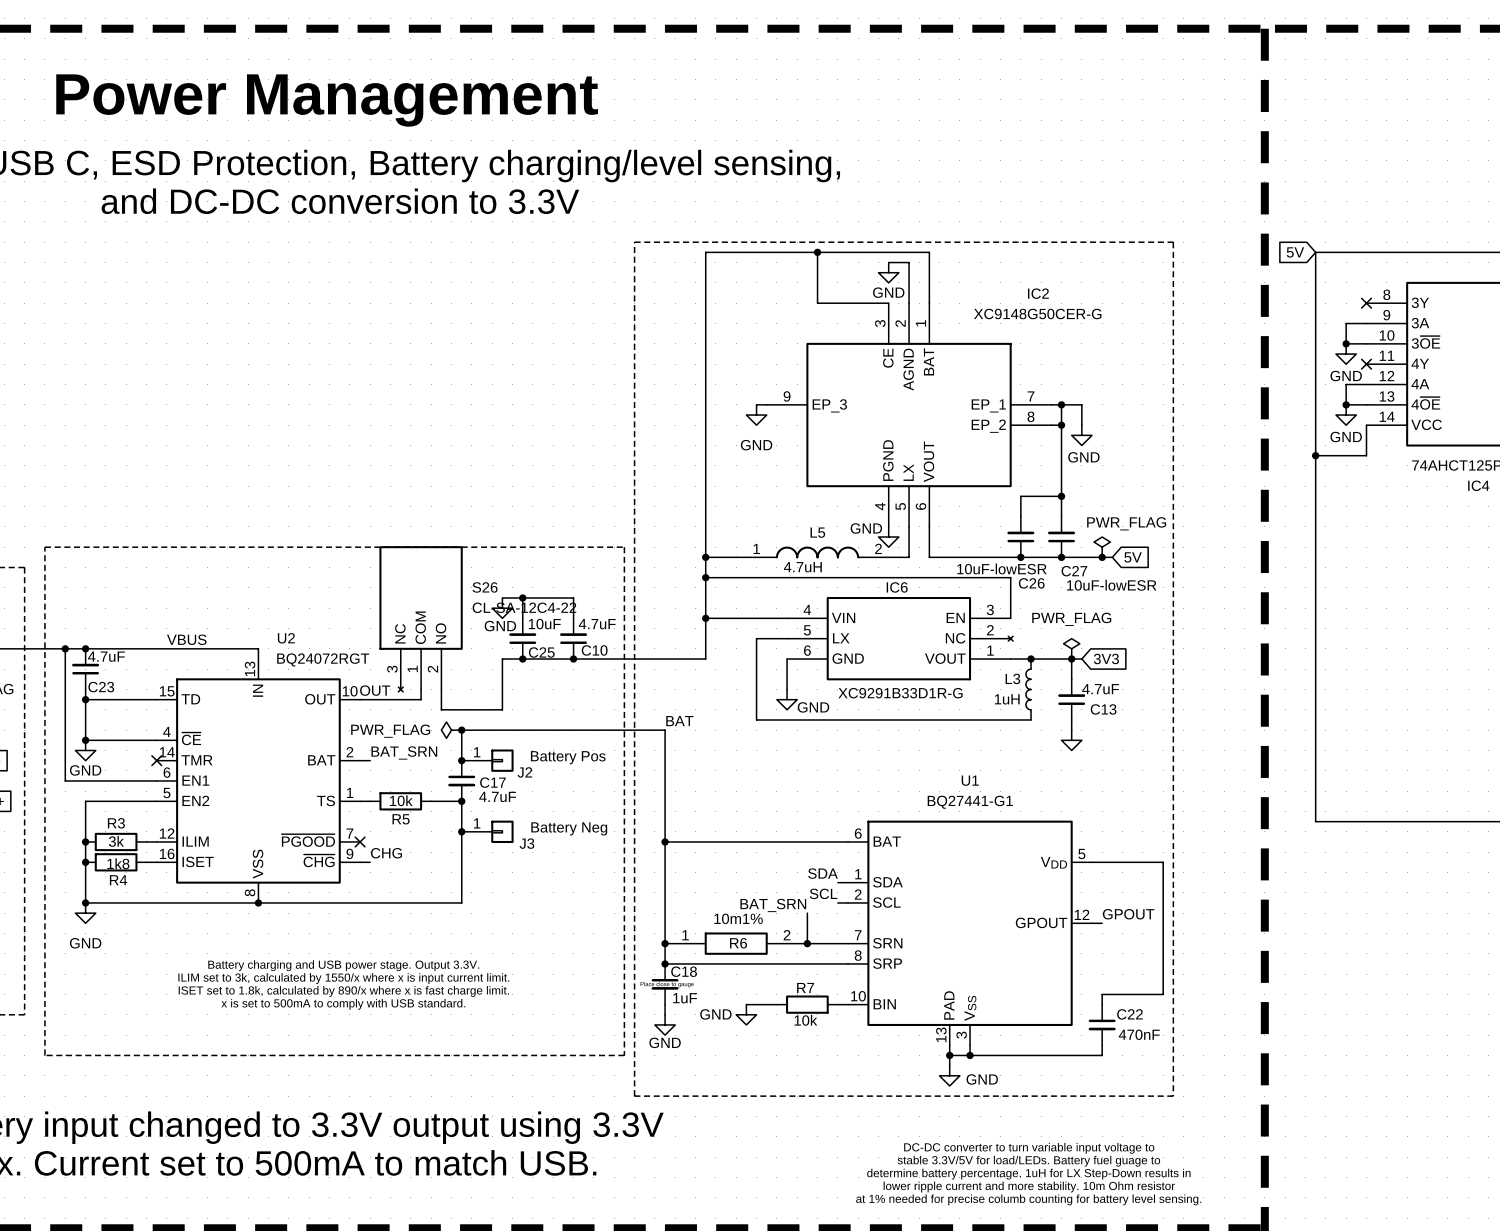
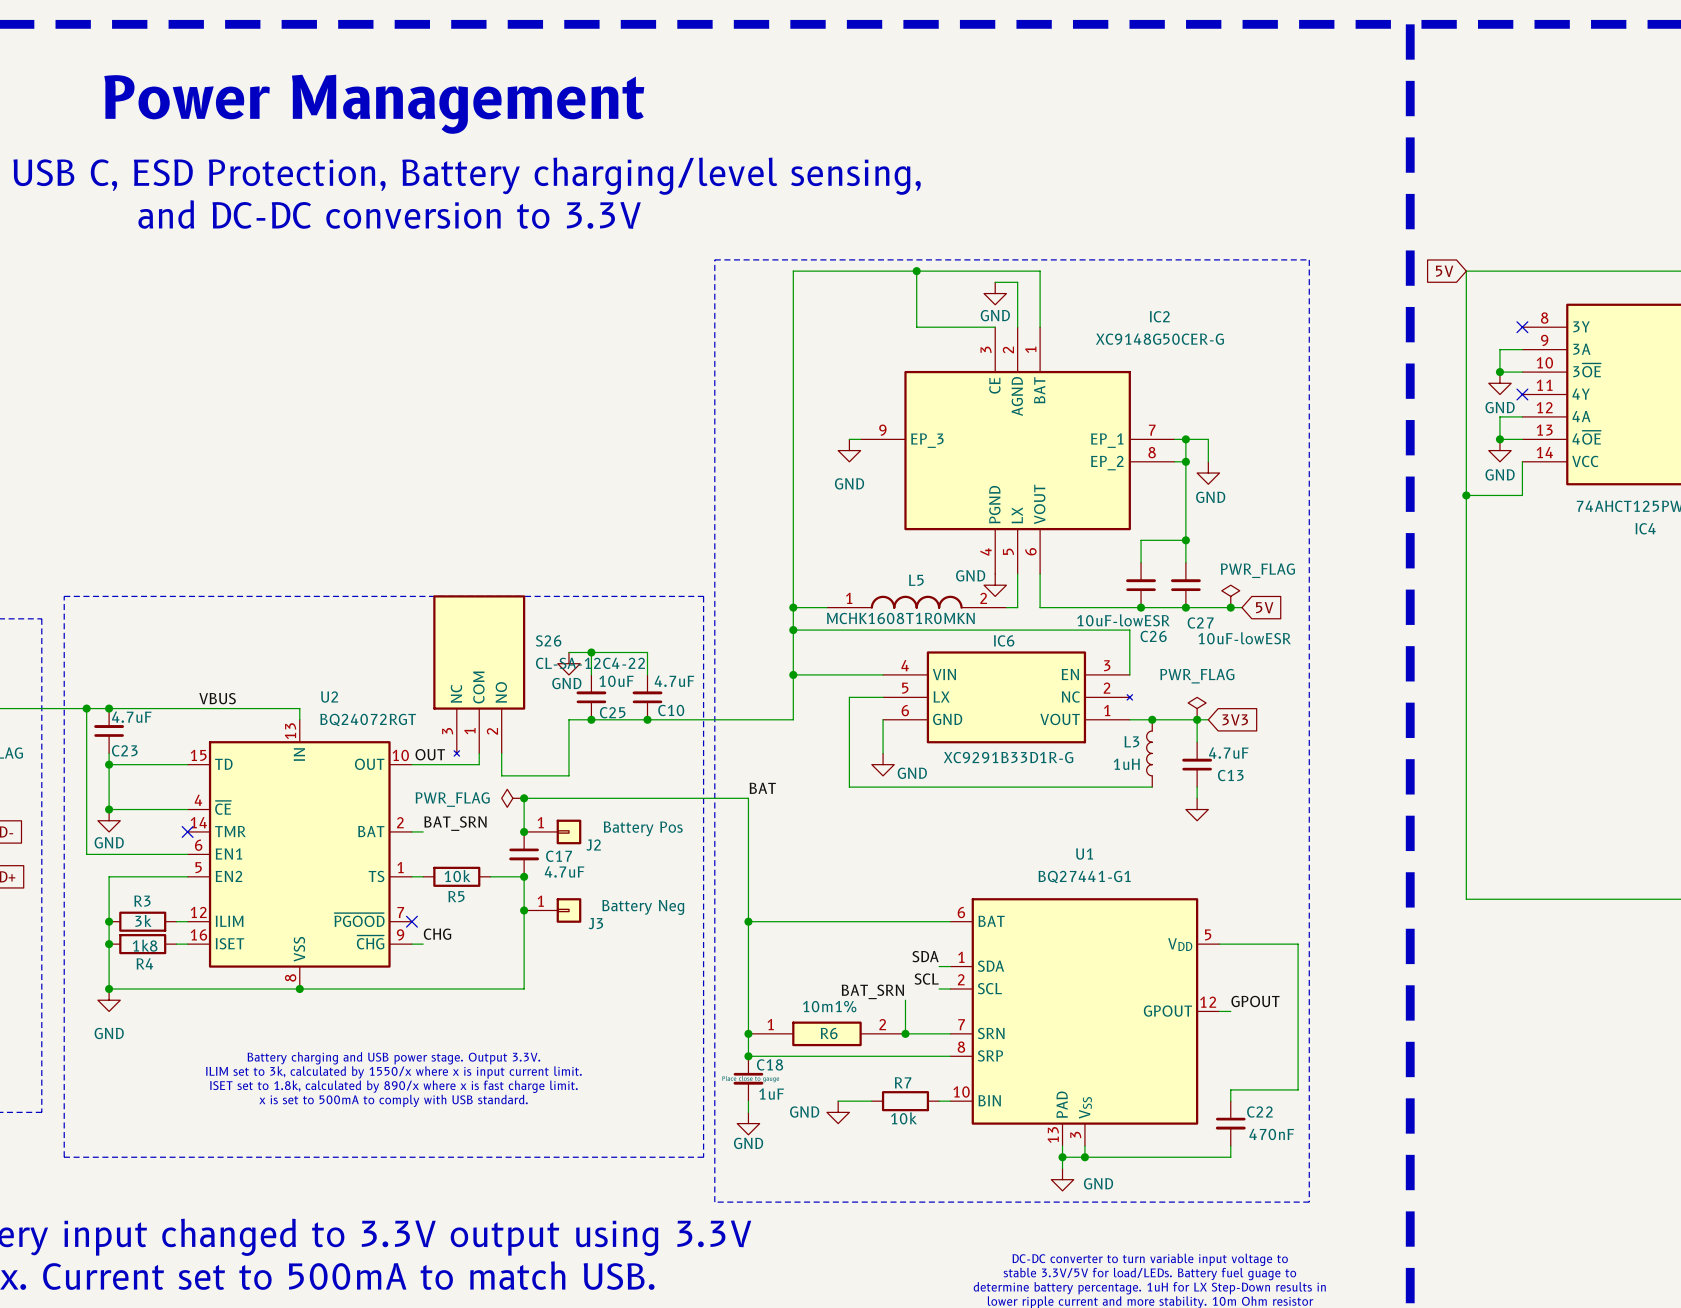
L5 value: 4.7uH (802, 567) -> MCHK1608T1R0MKN (900, 618)

